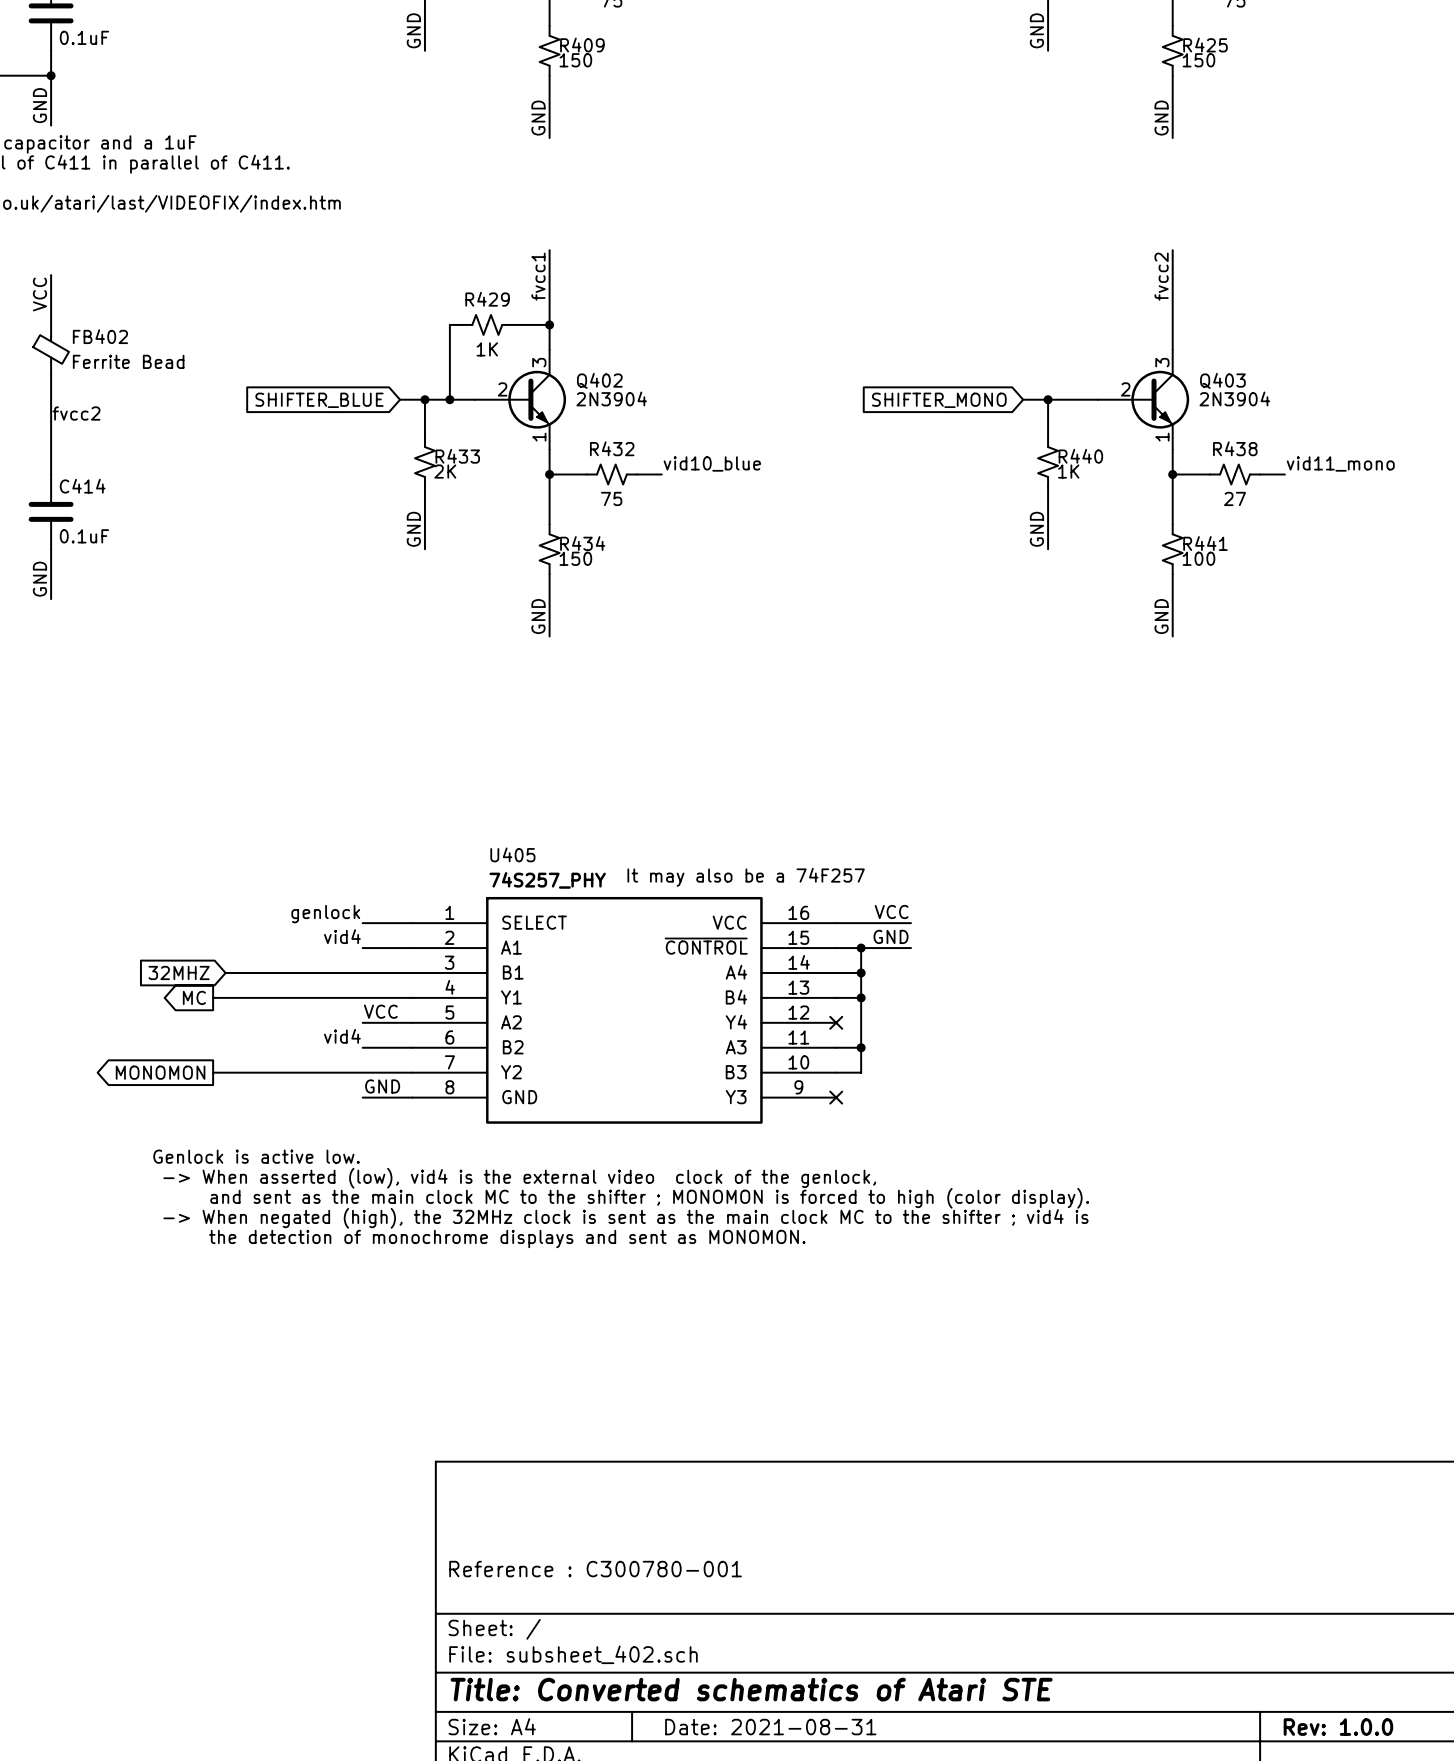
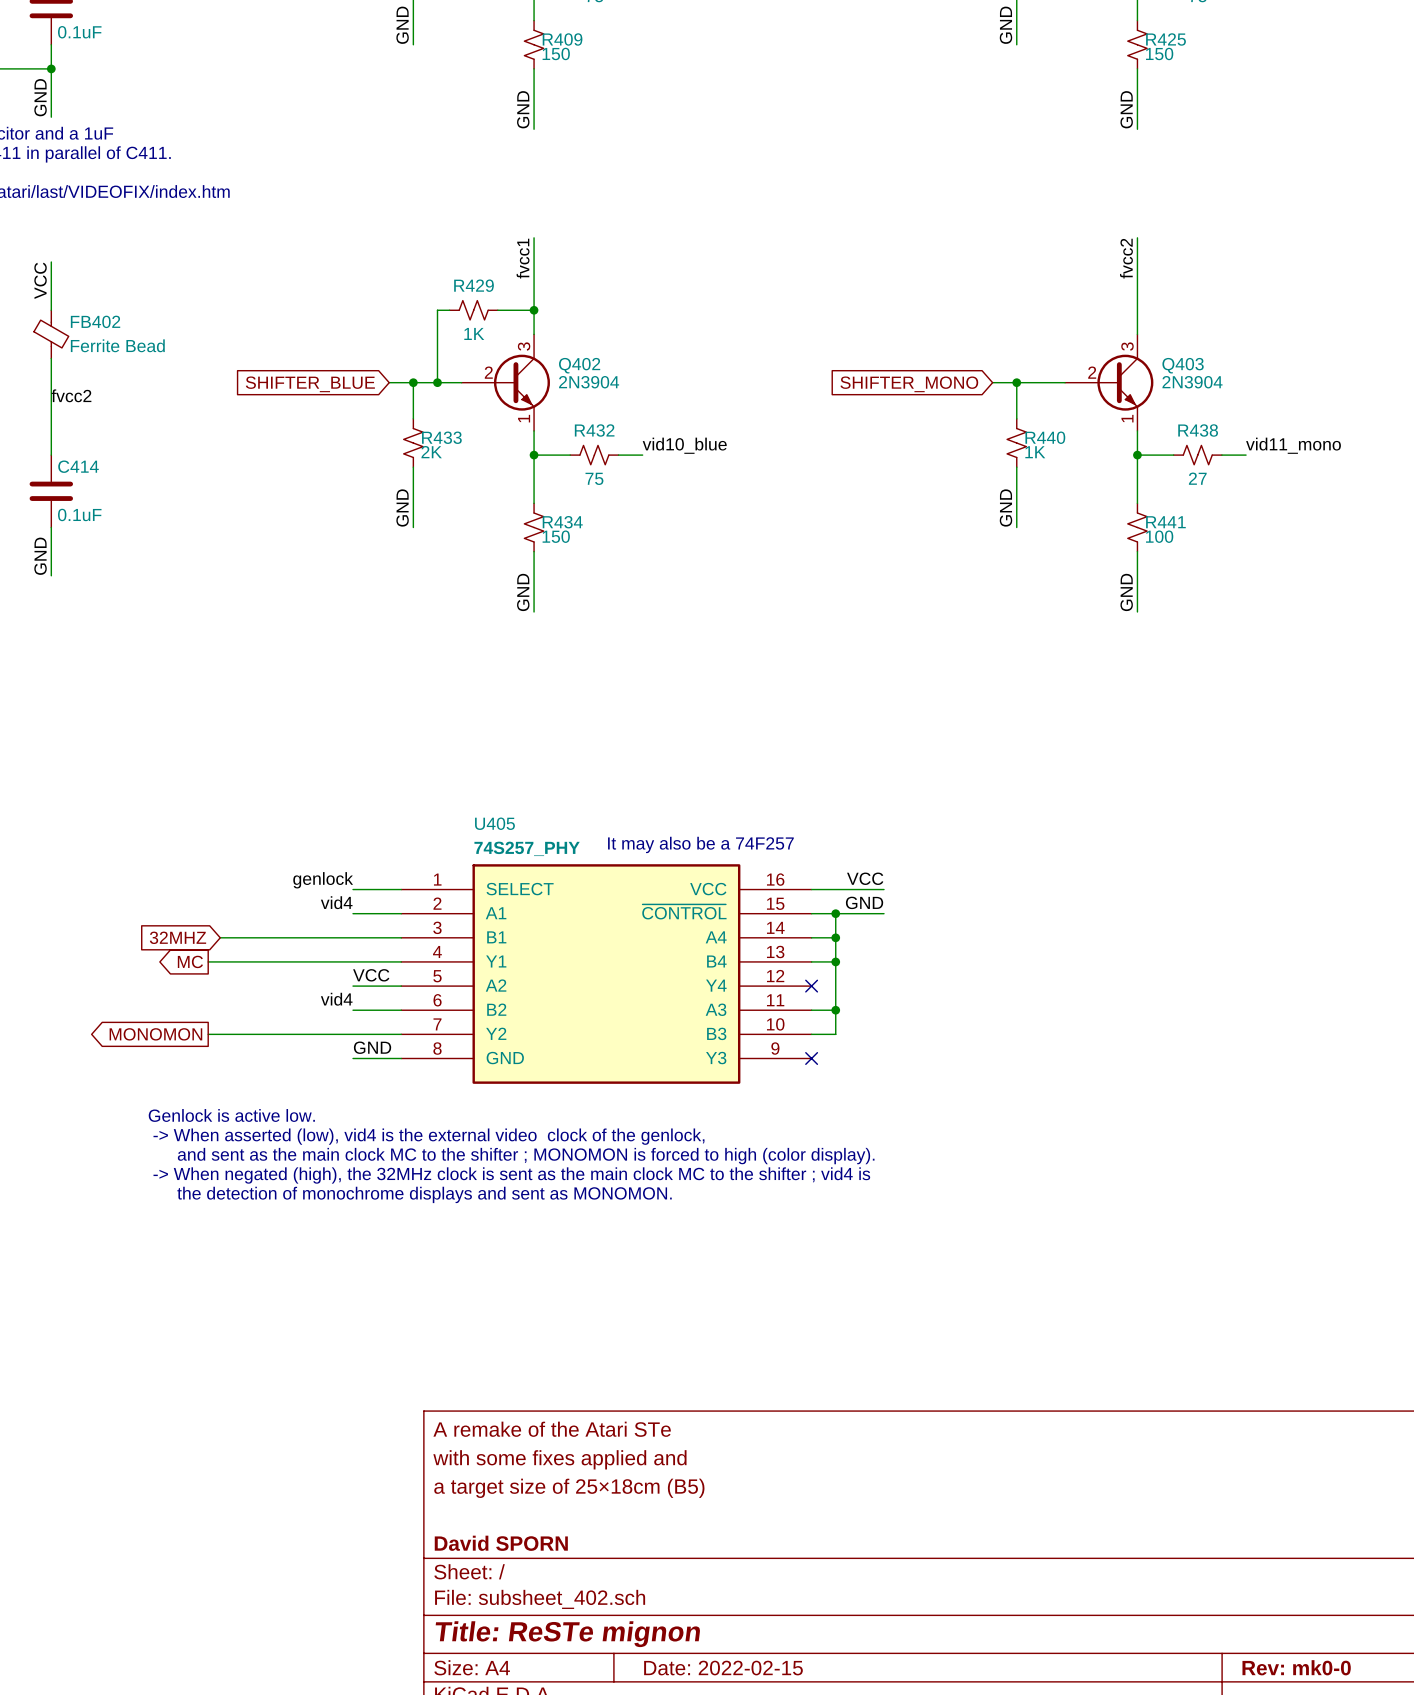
title block: none -> A remake of the Atari STe (552, 1429)
title block: none -> with some fixes applied and (559, 1459)
title block: none -> a target size of 25×18cm (B5) (569, 1488)
title block: Reference : C300780-001 (595, 1569) -> none
title block: none -> David SPORN (501, 1543)
title block: Title: Converted schematics of Atari STE (751, 1689) -> Title: ReSTe mignon (567, 1634)
title block: Date: 2021-08-31 (770, 1727) -> Date: 2022-02-15 (723, 1668)
title block: Rev: 1.0.0 (1338, 1727) -> Rev: mk0-0 (1296, 1667)

